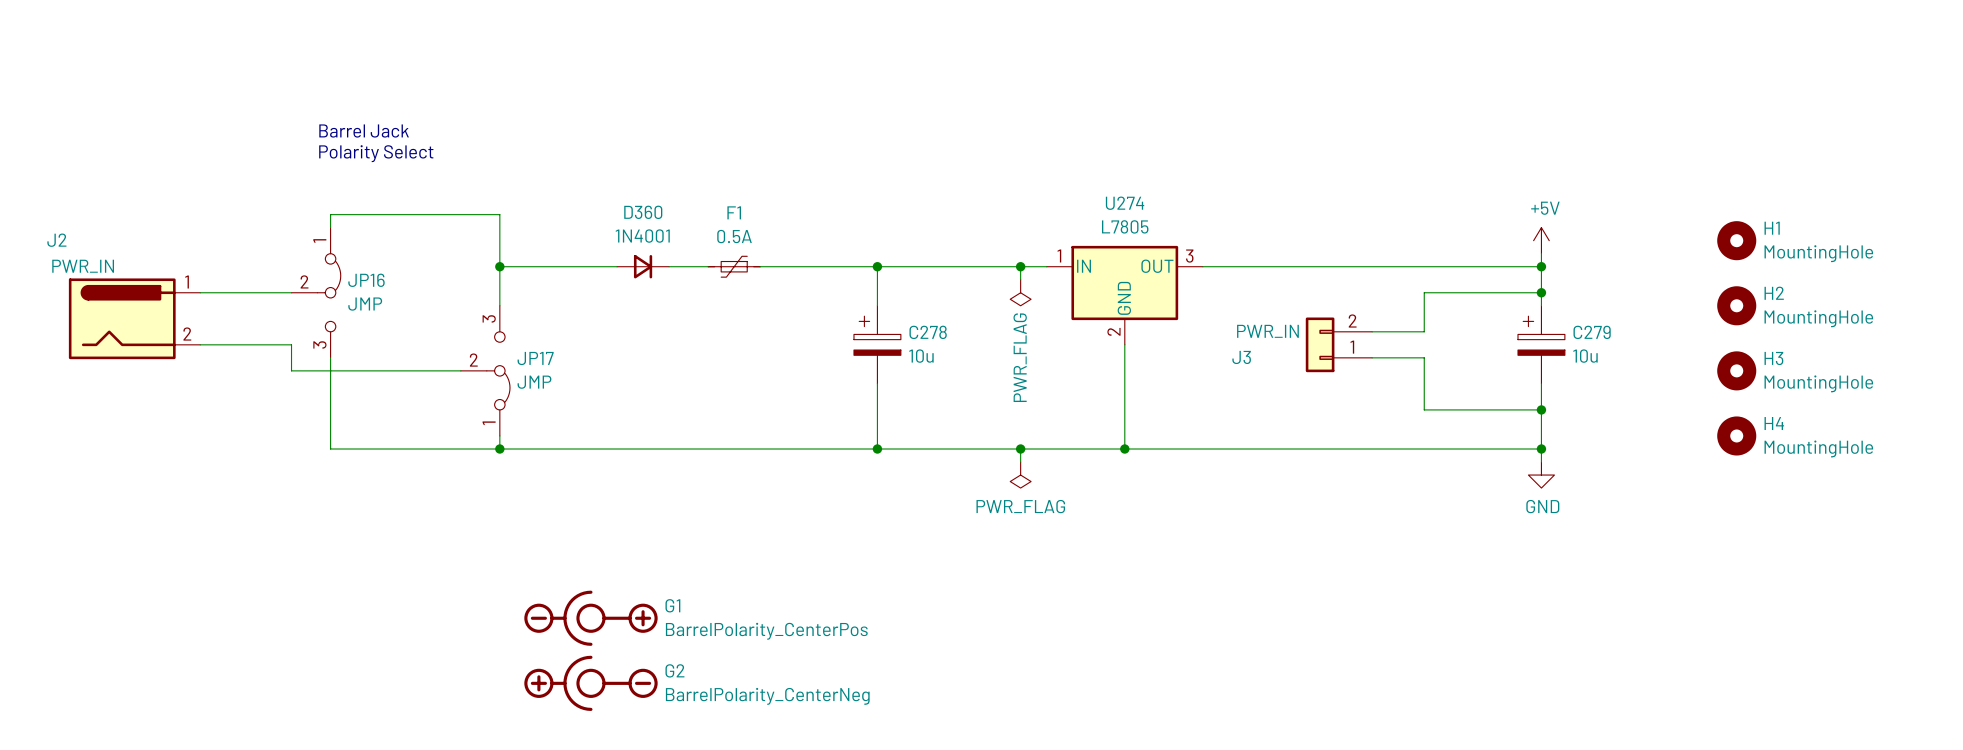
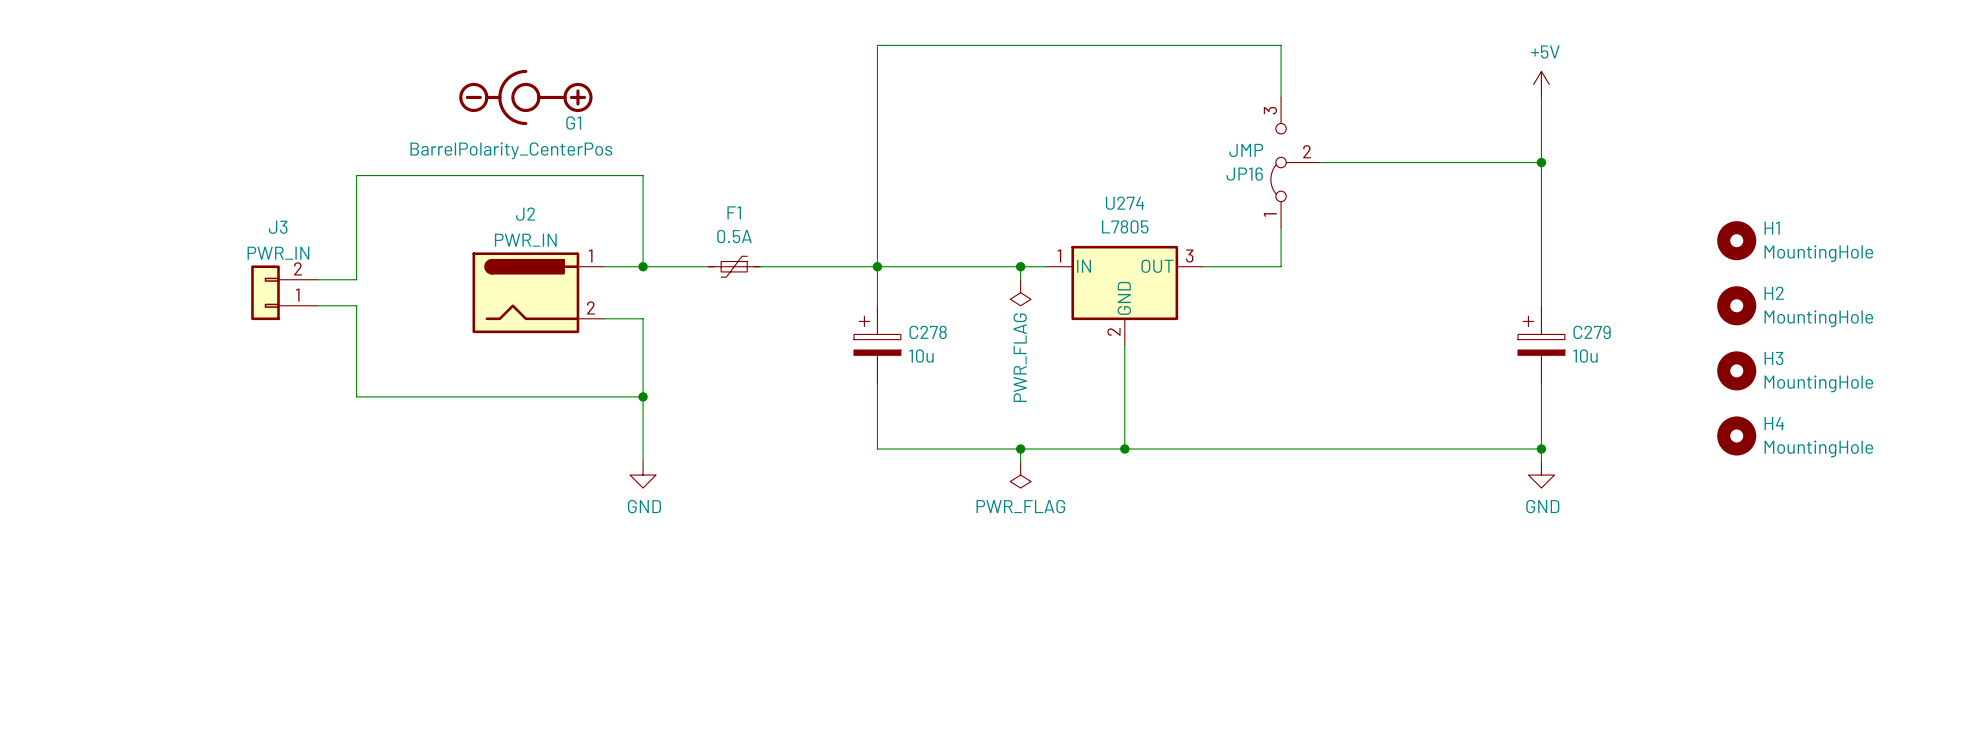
wire: none -> (1281, 97) (1281, 45) (877, 45) (877, 266)
wire: none -> (1541, 97) (1541, 253)
text: Barrel Jack (364, 131) -> none
text: Polarity Select (376, 153) -> none
wire: none -> (1320, 162) (1541, 162)
junction: none -> (1541, 162)
wire: (330, 227) (330, 214) (499, 214) (499, 305) -> none
J2 name position: J2 (56, 240) -> J2 (525, 214)
power symbol position: +5V (1541, 240) -> +5V (1541, 84)
J2 value position: PWR_IN (83, 266) -> PWR_IN (525, 240)
junction: (499, 266) -> none
wire: none -> (643, 266) (643, 175) (356, 175) (356, 279) (317, 279)
D360: 1N4001 (643, 266) -> none
junction: none -> (643, 266)
wire: (1281, 266) (1541, 266) -> (1281, 266) (1281, 227)
junction: (1541, 266) -> none
wire: (200, 292) (291, 292) -> none
JP16 position: (316, 292) -> (1295, 162)
JP16 rotation: 0° (329, 292) -> 180° (1282, 162)
wire: (1541, 292) (1424, 292) (1424, 331) (1372, 331) -> none
junction: (1541, 292) -> none
wire: none -> (317, 305) (356, 305) (356, 396) (643, 396)
J2 position: (134, 318) -> (538, 292)
wire: none -> (604, 318) (643, 318) (643, 462)
J3 value position: PWR_IN (1267, 331) -> PWR_IN (278, 253)
wire: (200, 344) (291, 344) (291, 370) (460, 370) -> none
J3 position: (1338, 344) -> (284, 292)
wire: (330, 357) (330, 449) (877, 449) -> none
J3 name position: J3 (1241, 357) -> J3 (278, 227)
wire: (1372, 357) (1424, 357) (1424, 409) (1541, 409) -> none
JP17: JMP (485, 370) -> none
junction: none -> (643, 396)
junction: (1541, 409) -> none
wire: (499, 435) (499, 449) -> none
junction: (499, 449) -> none
junction: (877, 449) -> none
power symbol: none -> GND (643, 475)
G1 name position: G1 (672, 605) -> G1 (573, 123)
G1 position: (590, 618) -> (525, 97)
G1 value position: BarrelPolarity_CenterPos (766, 631) -> BarrelPolarity_CenterPos (511, 150)
G2: BarrelPolarity_CenterNeg (590, 683) -> none

